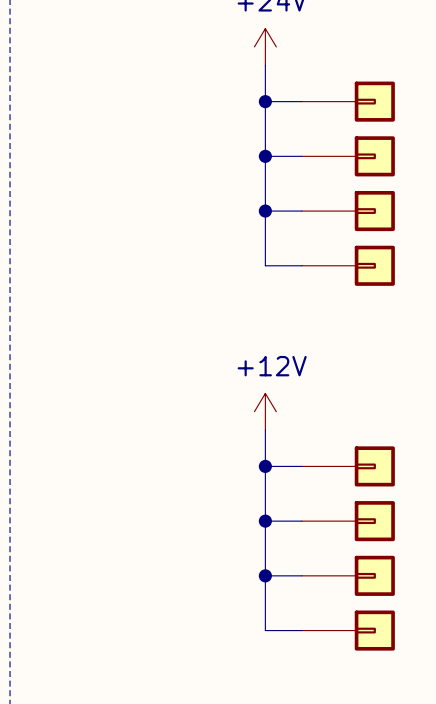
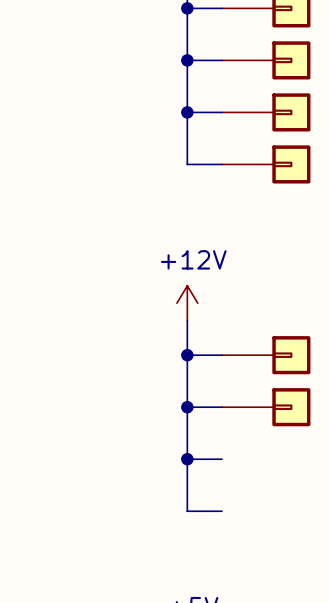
part: (348, 575) -> none
part: (348, 630) -> none

